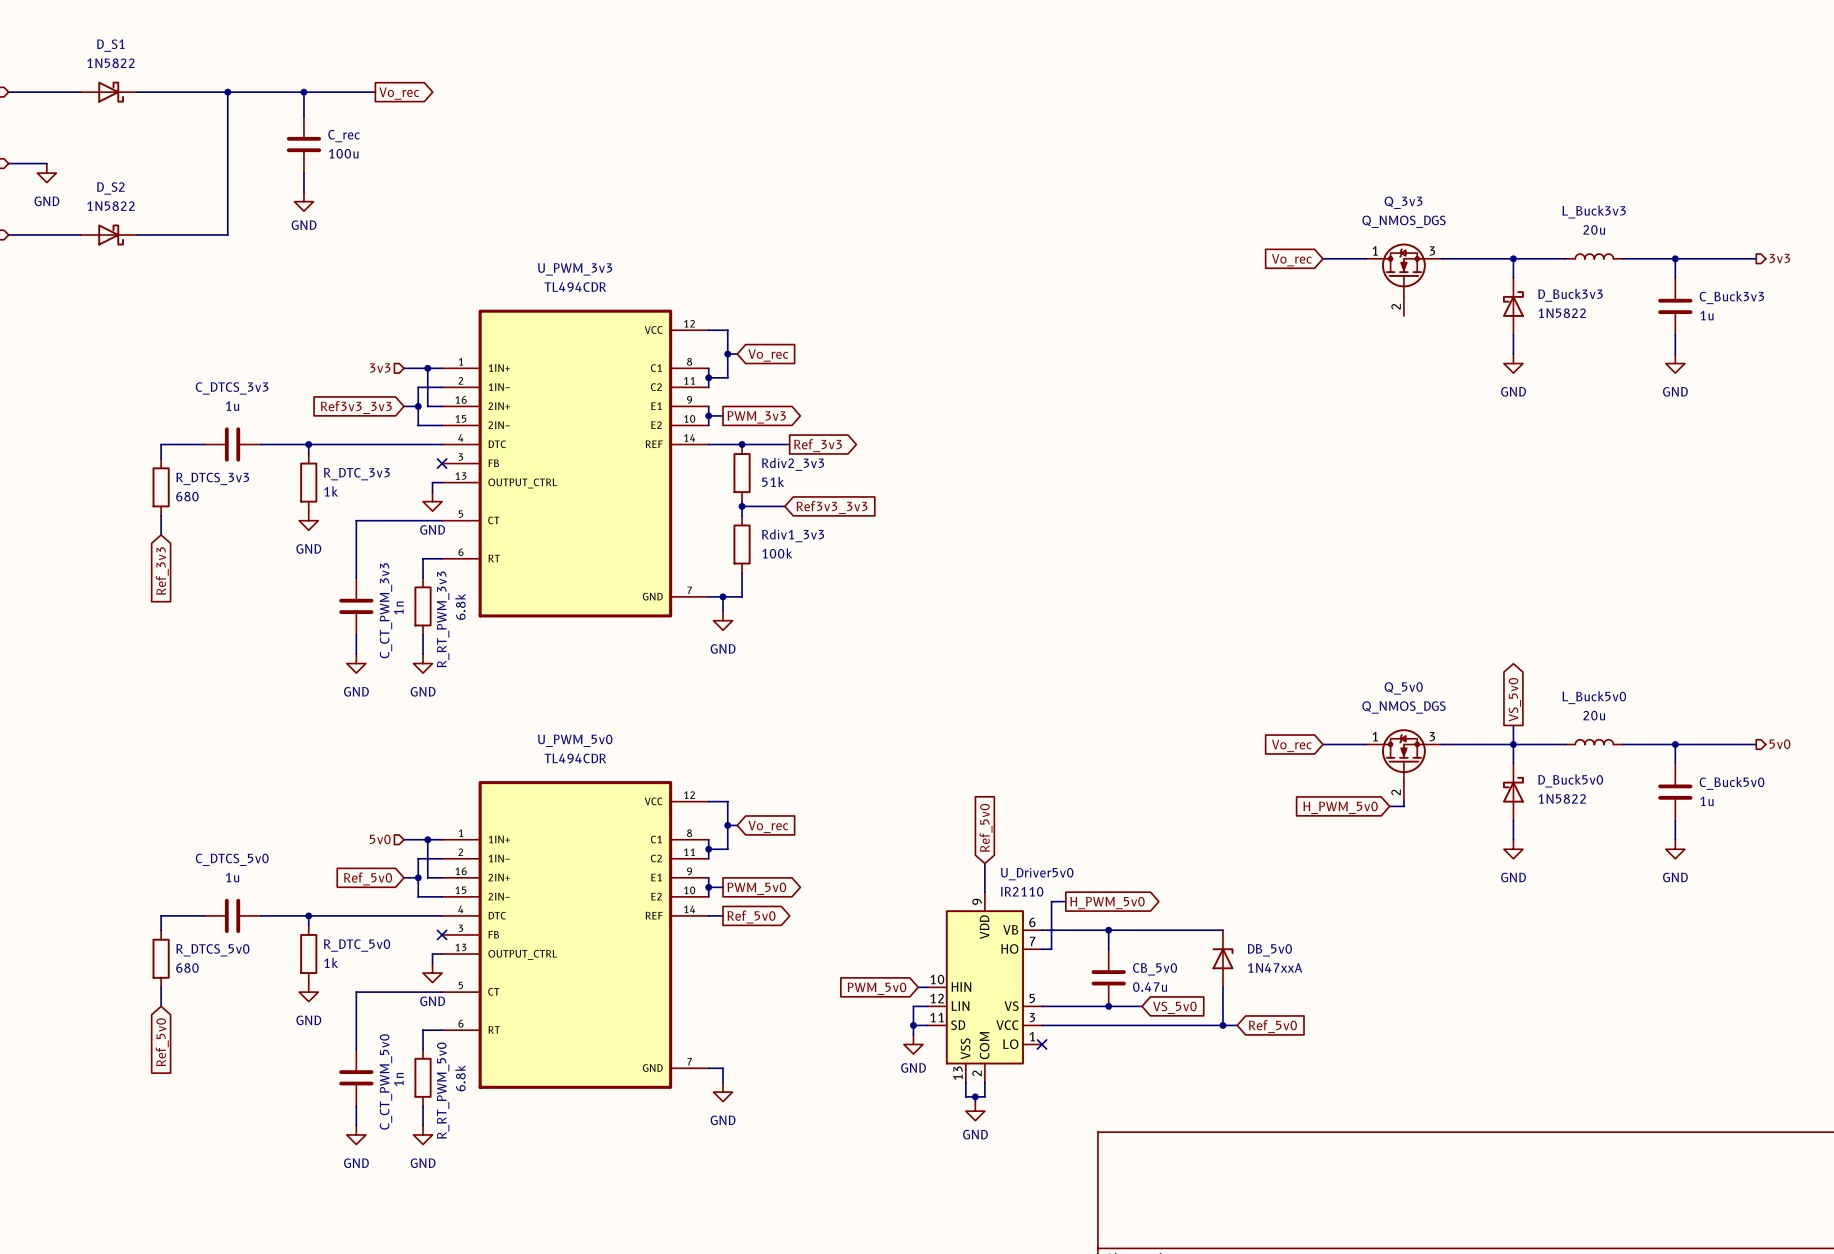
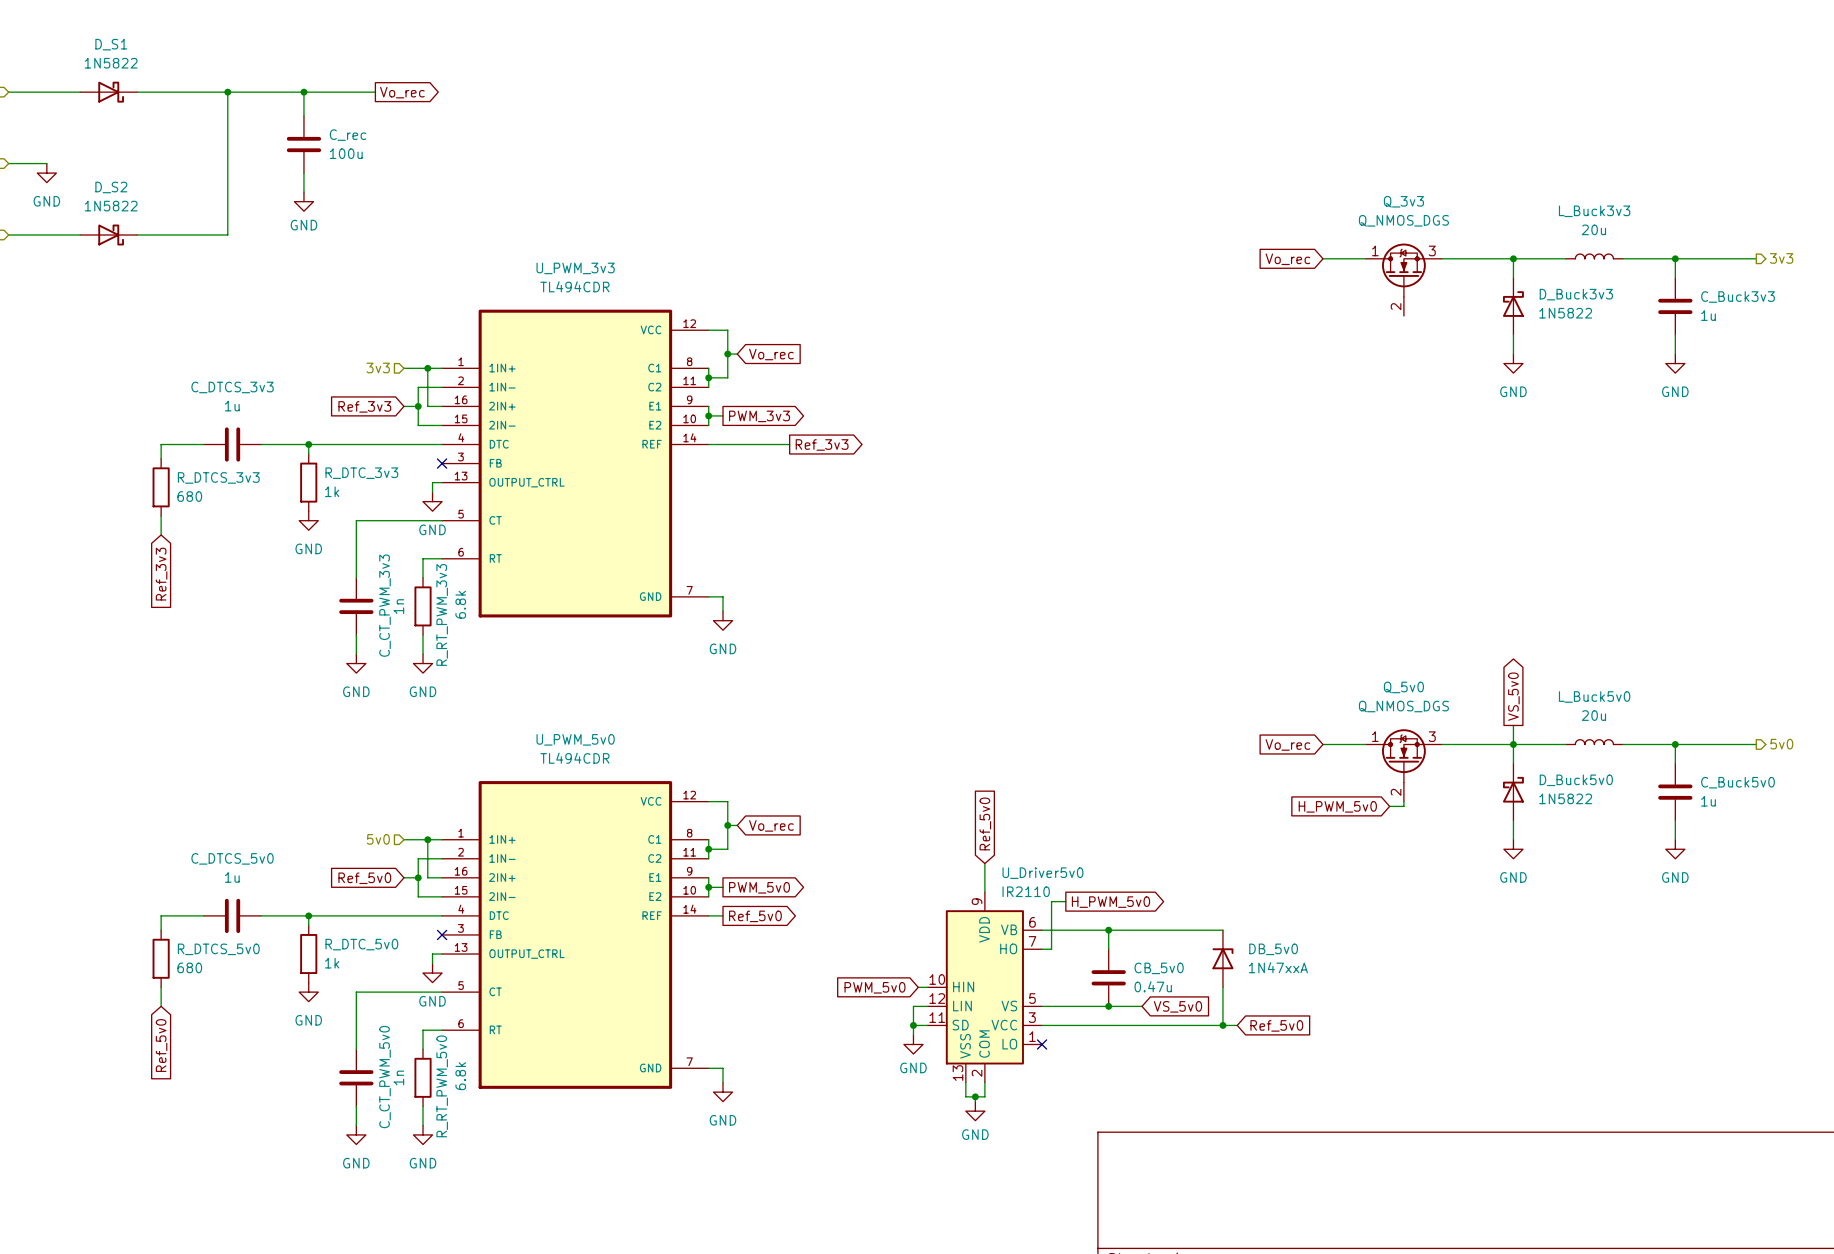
global label: Ref3v3_3v3 (356, 407) -> Ref_3v3 (364, 406)
junction: (742, 444) -> none
Rdiv2_3v3: 51k (742, 473) -> none
wire: (742, 501) (742, 515) -> none
wire: (742, 506) (784, 506) -> none
junction: (742, 506) -> none
global label: Ref3v3_3v3 (831, 507) -> none
Rdiv1_3v3: 100k (742, 544) -> none
wire: (742, 573) (742, 596) (723, 596) -> none
junction: (723, 596) -> none

